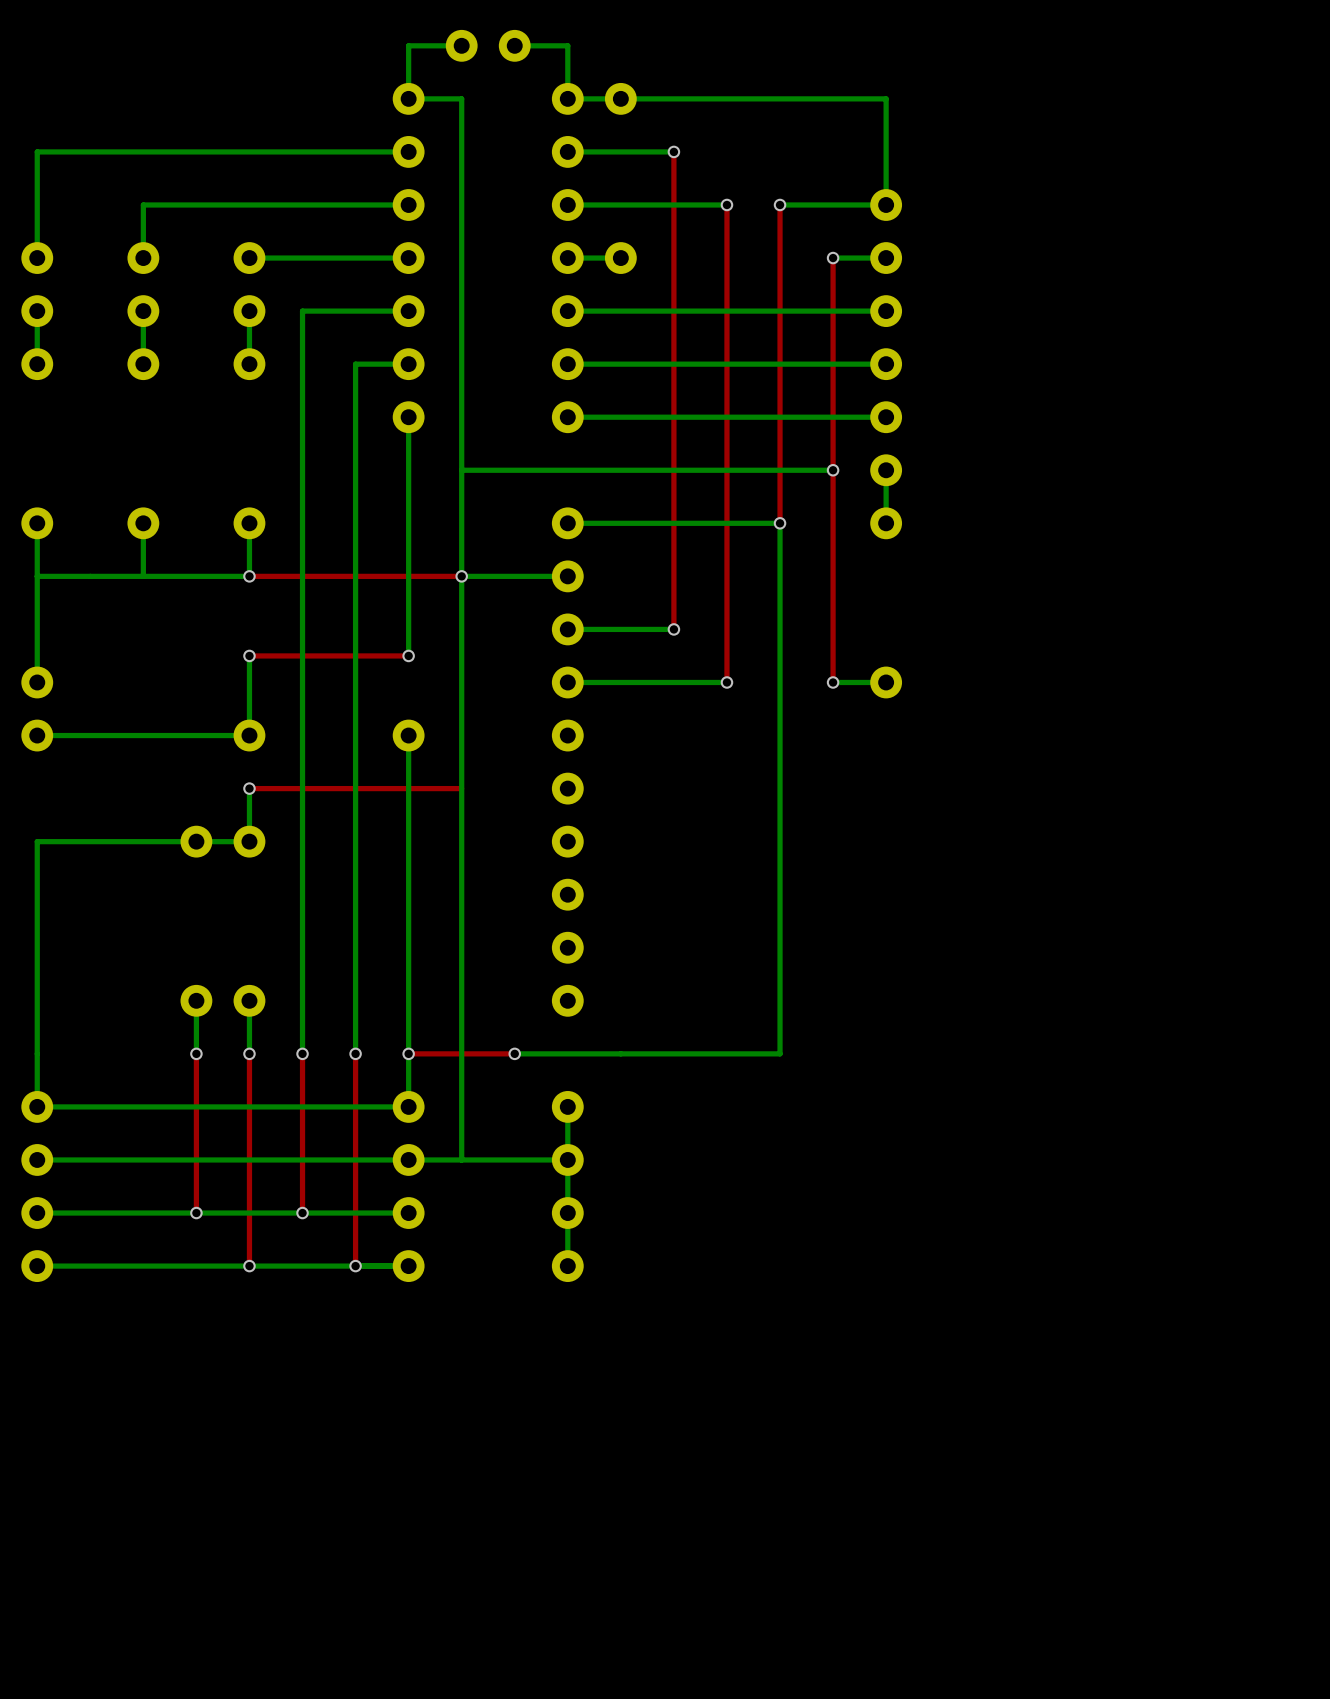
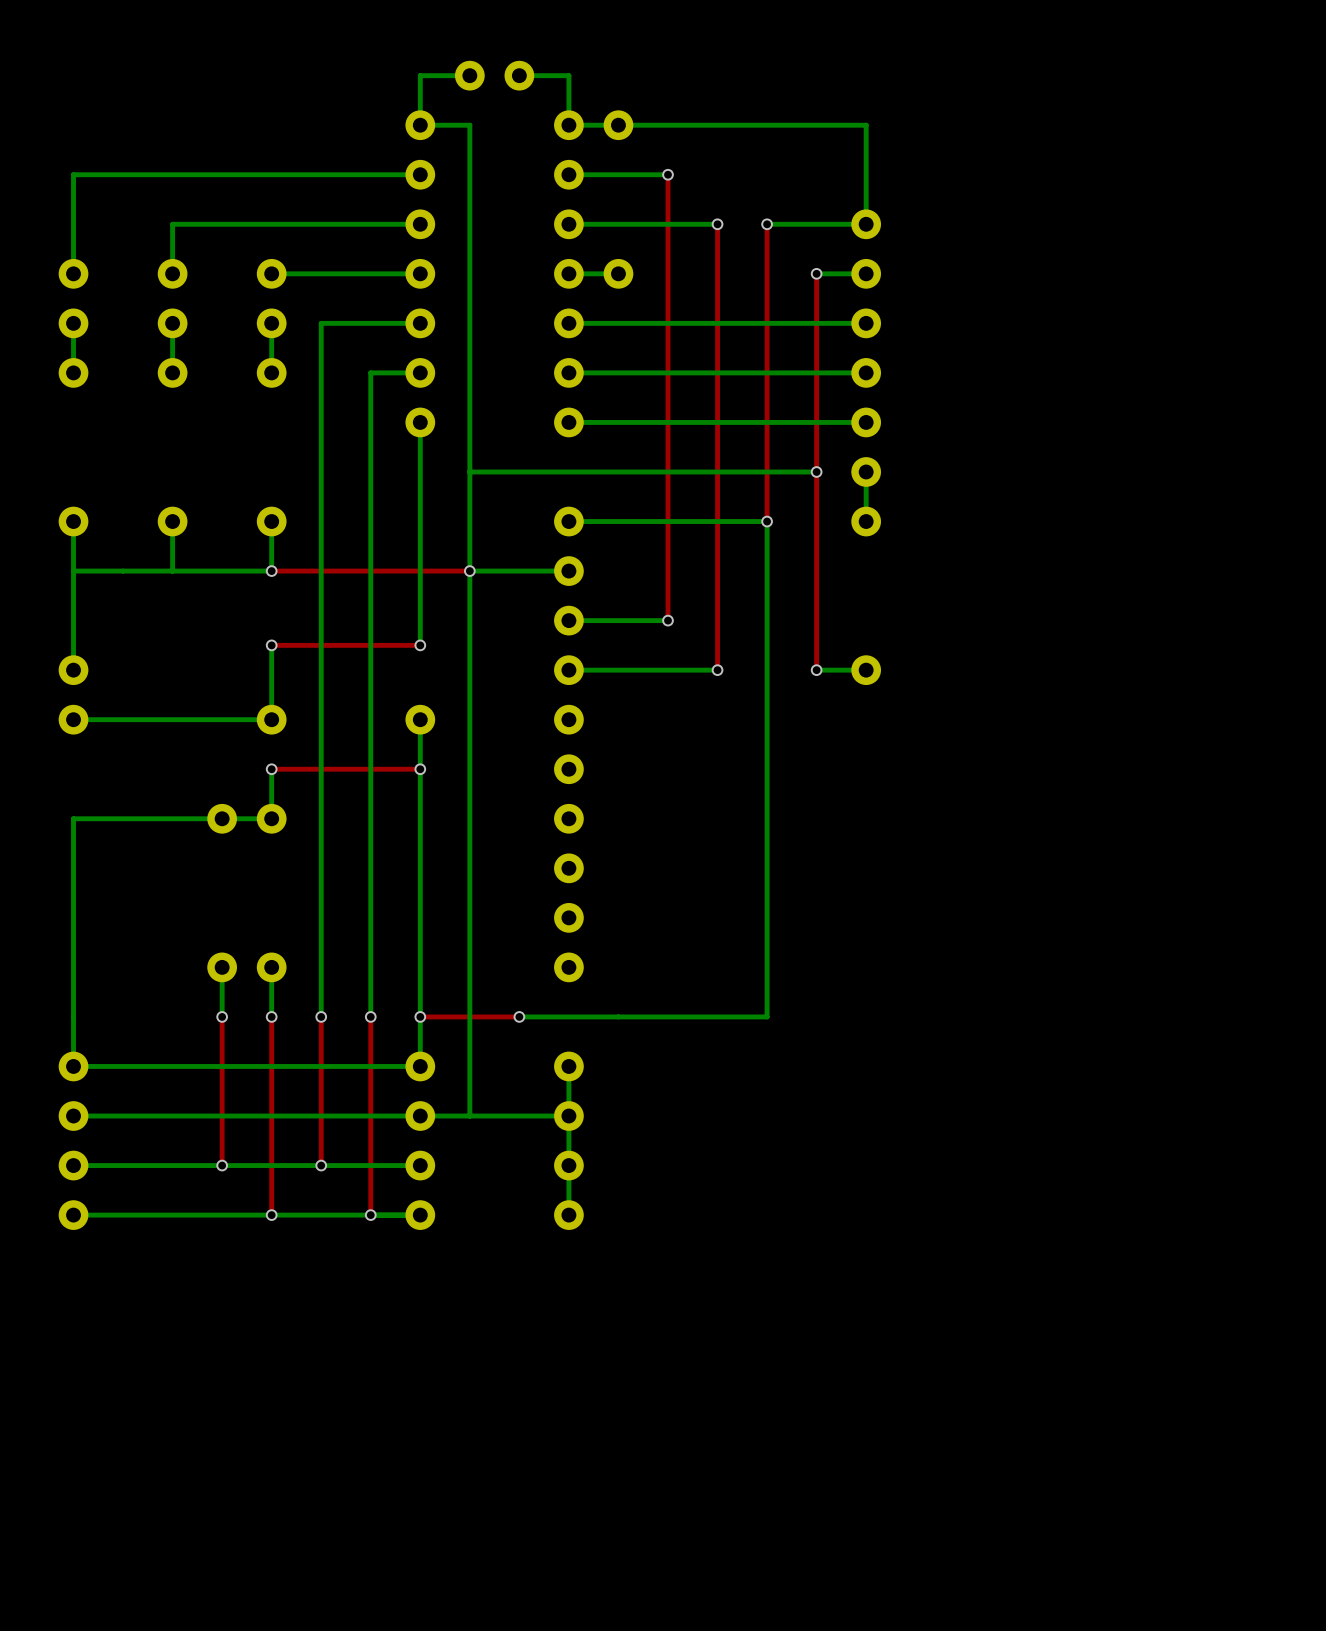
via: none -> (420, 769)
top track: (461, 788) (408, 788) -> none

